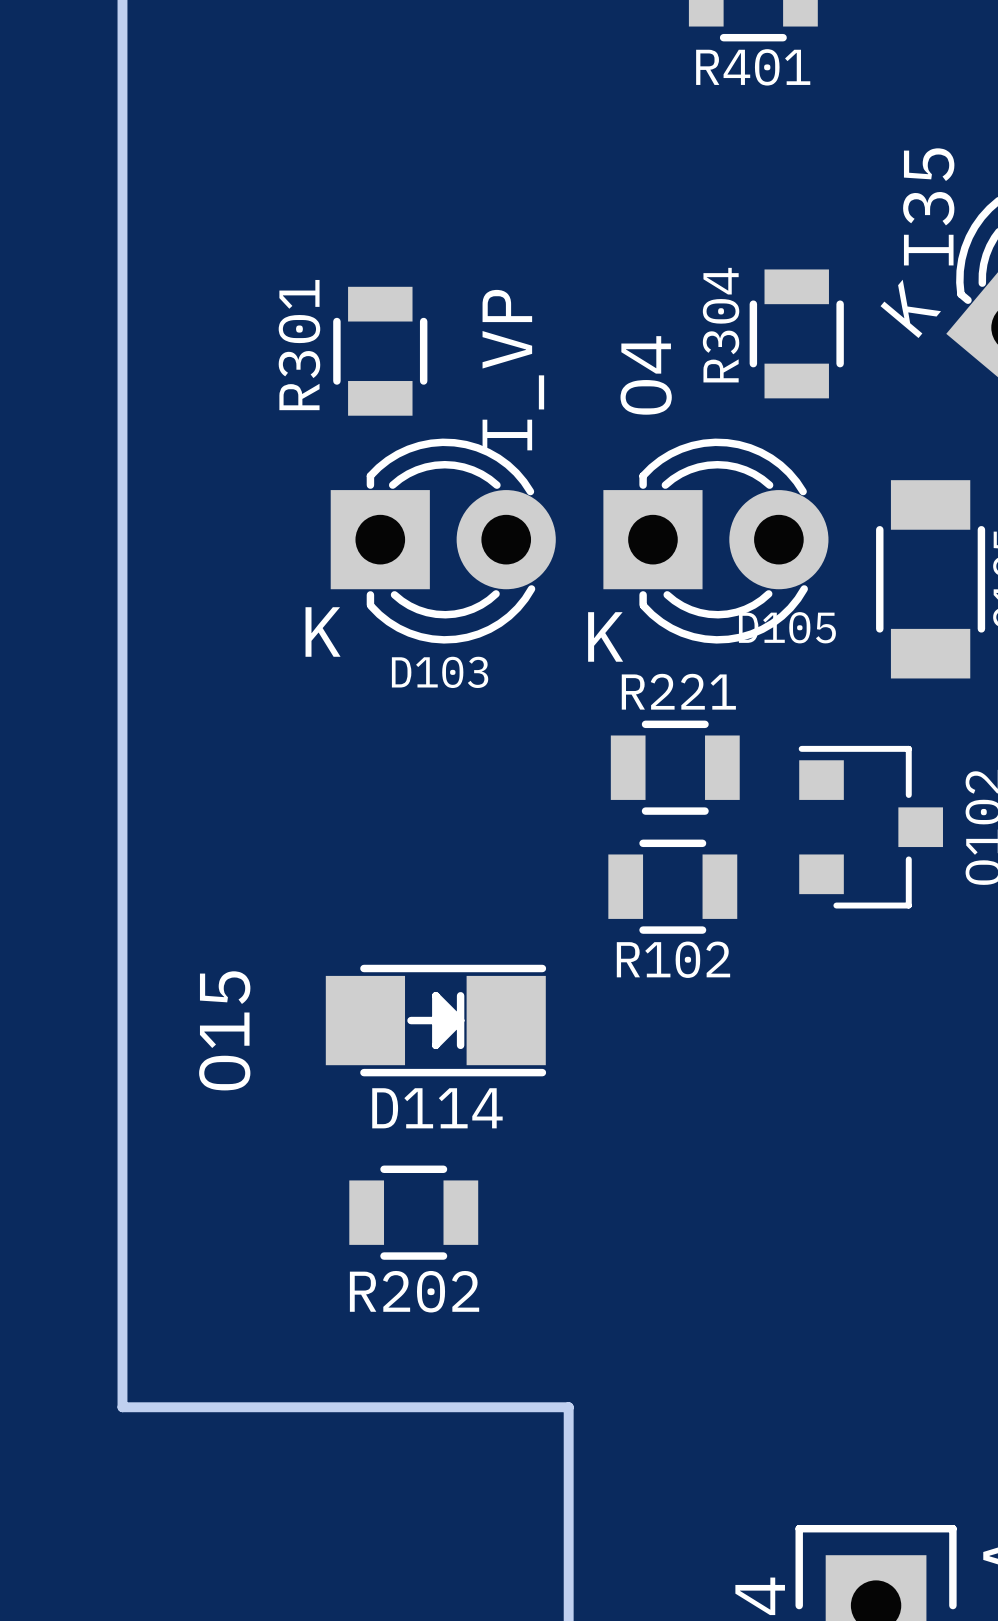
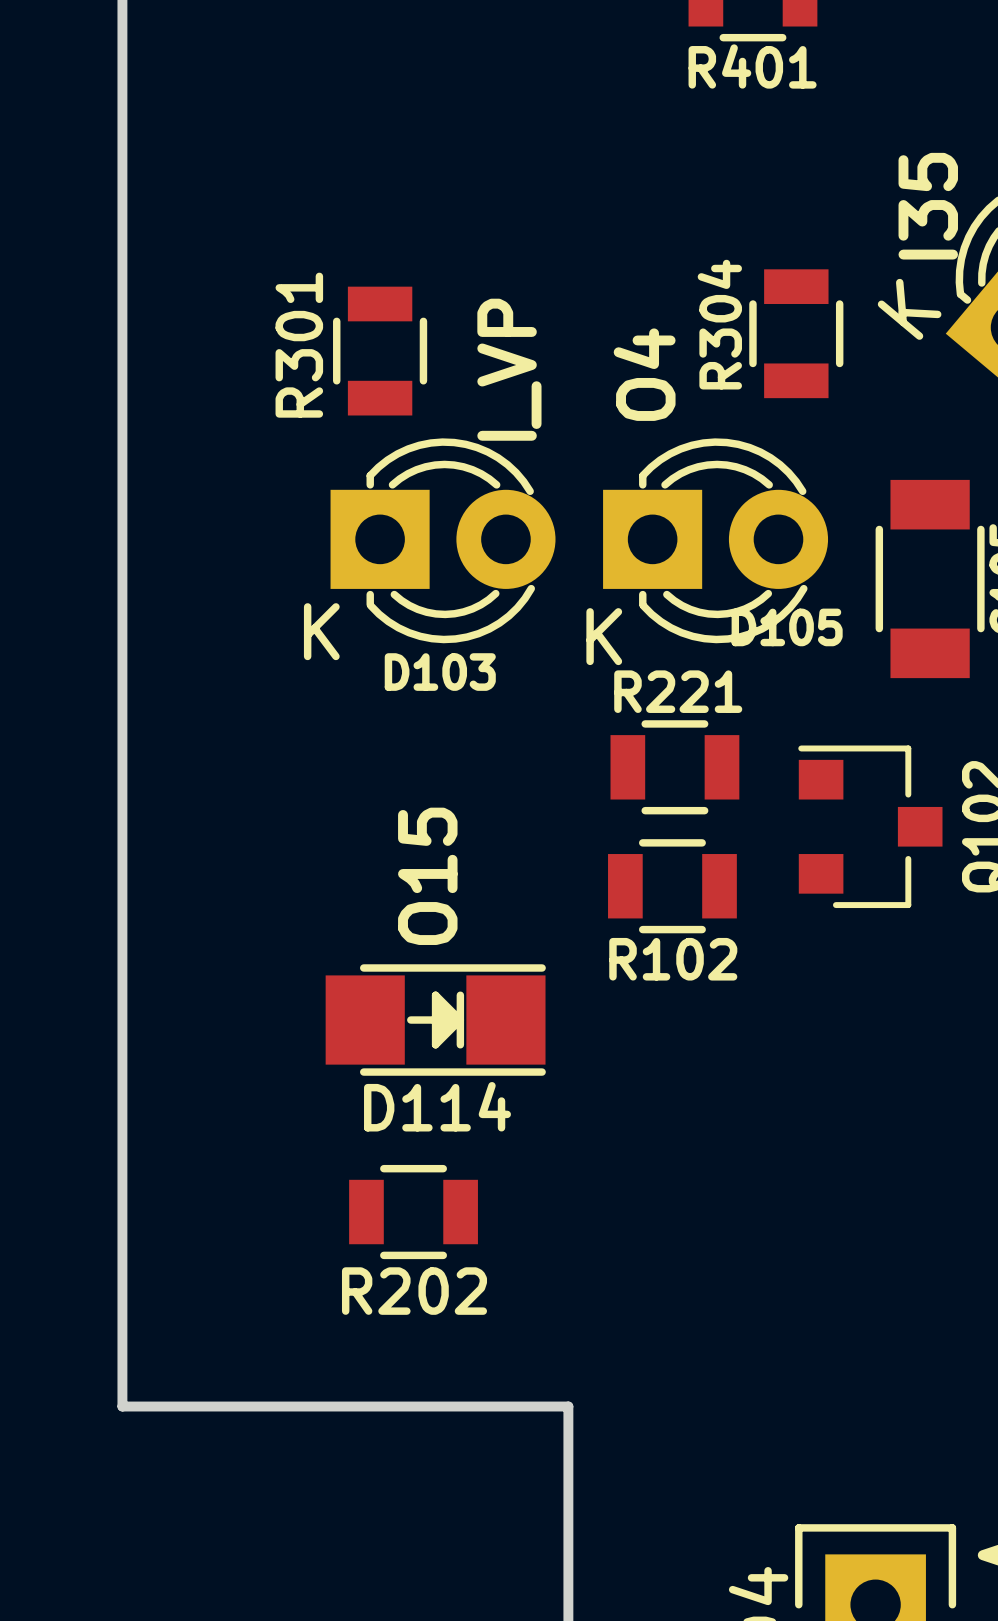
text position: O15 (224, 1030) -> O15 (427, 876)

